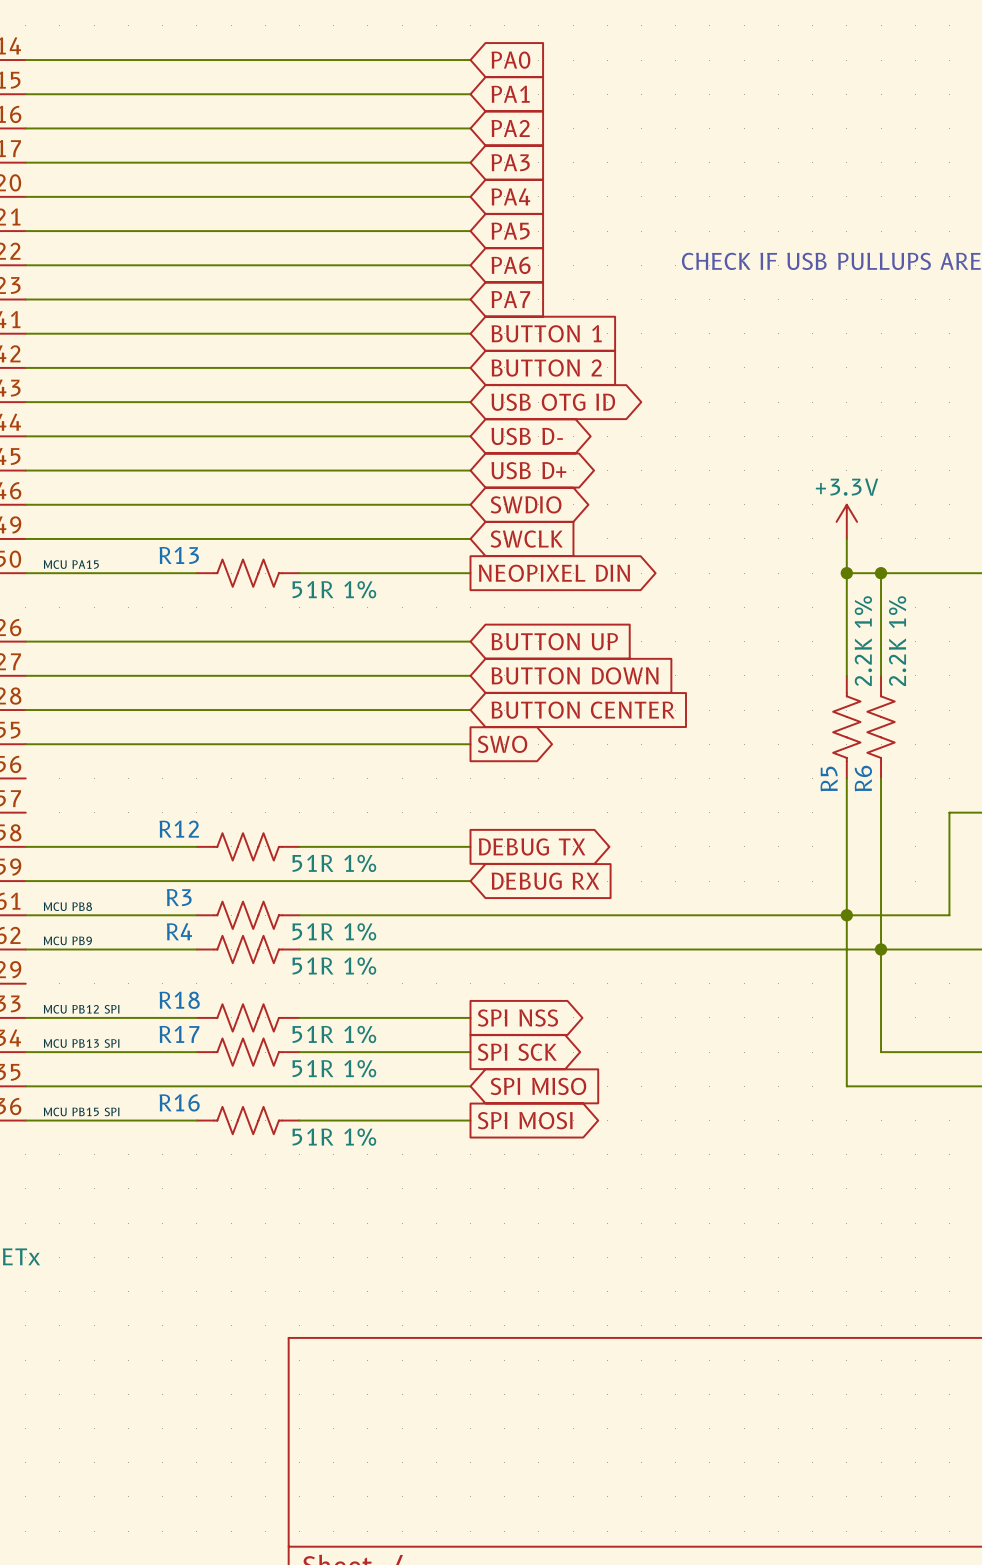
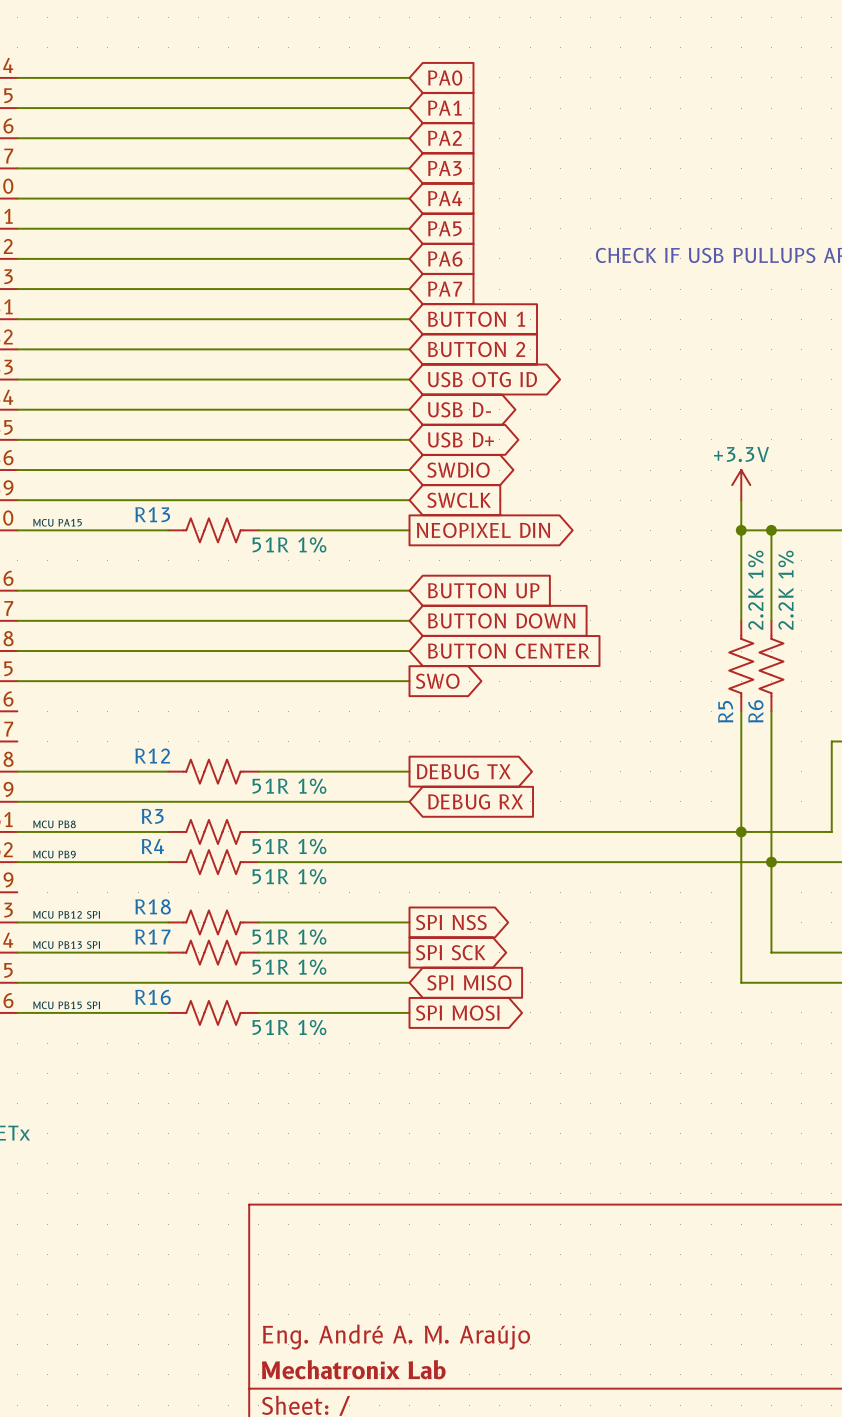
title block: none -> Eng. André A. M. Araújo (396, 1336)
title block: none -> Mechatronix Lab (353, 1369)

